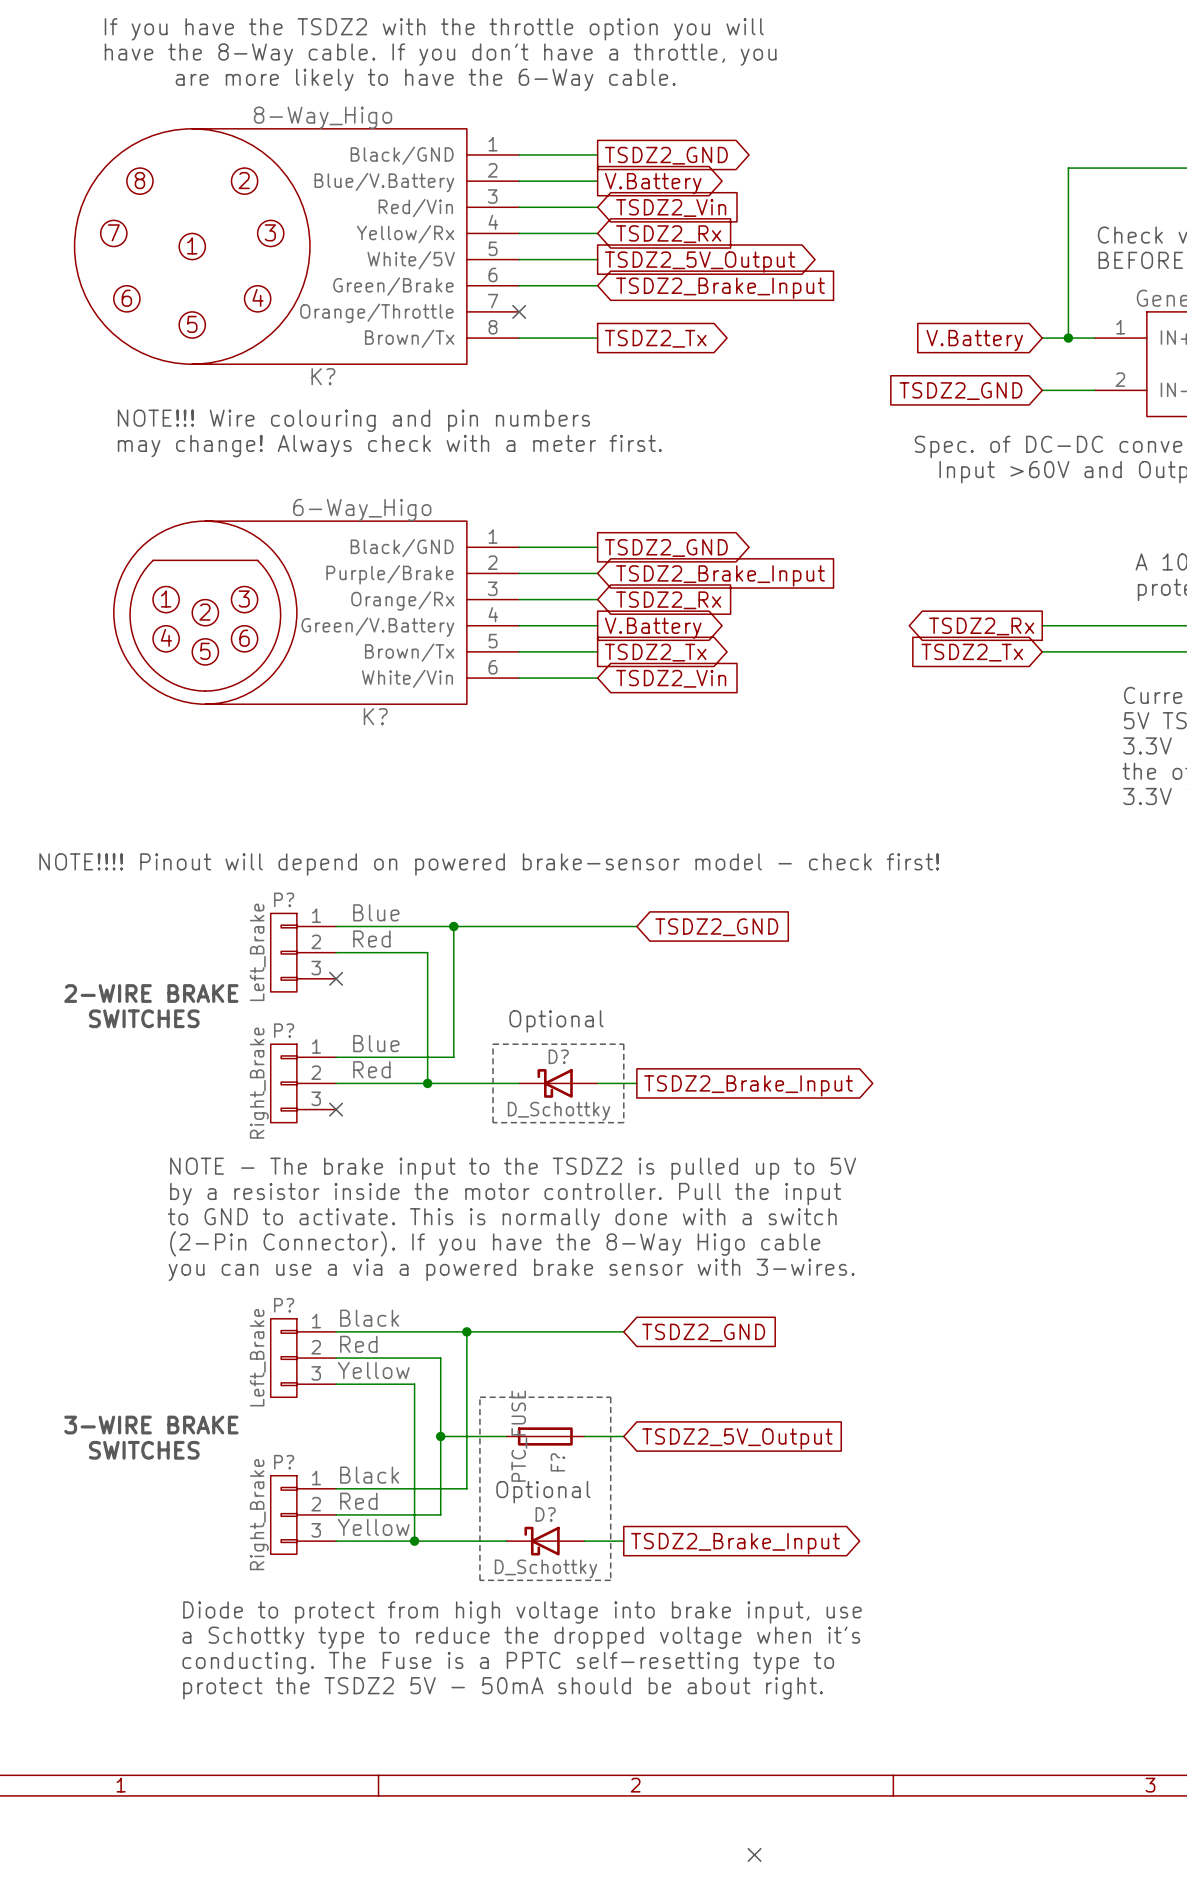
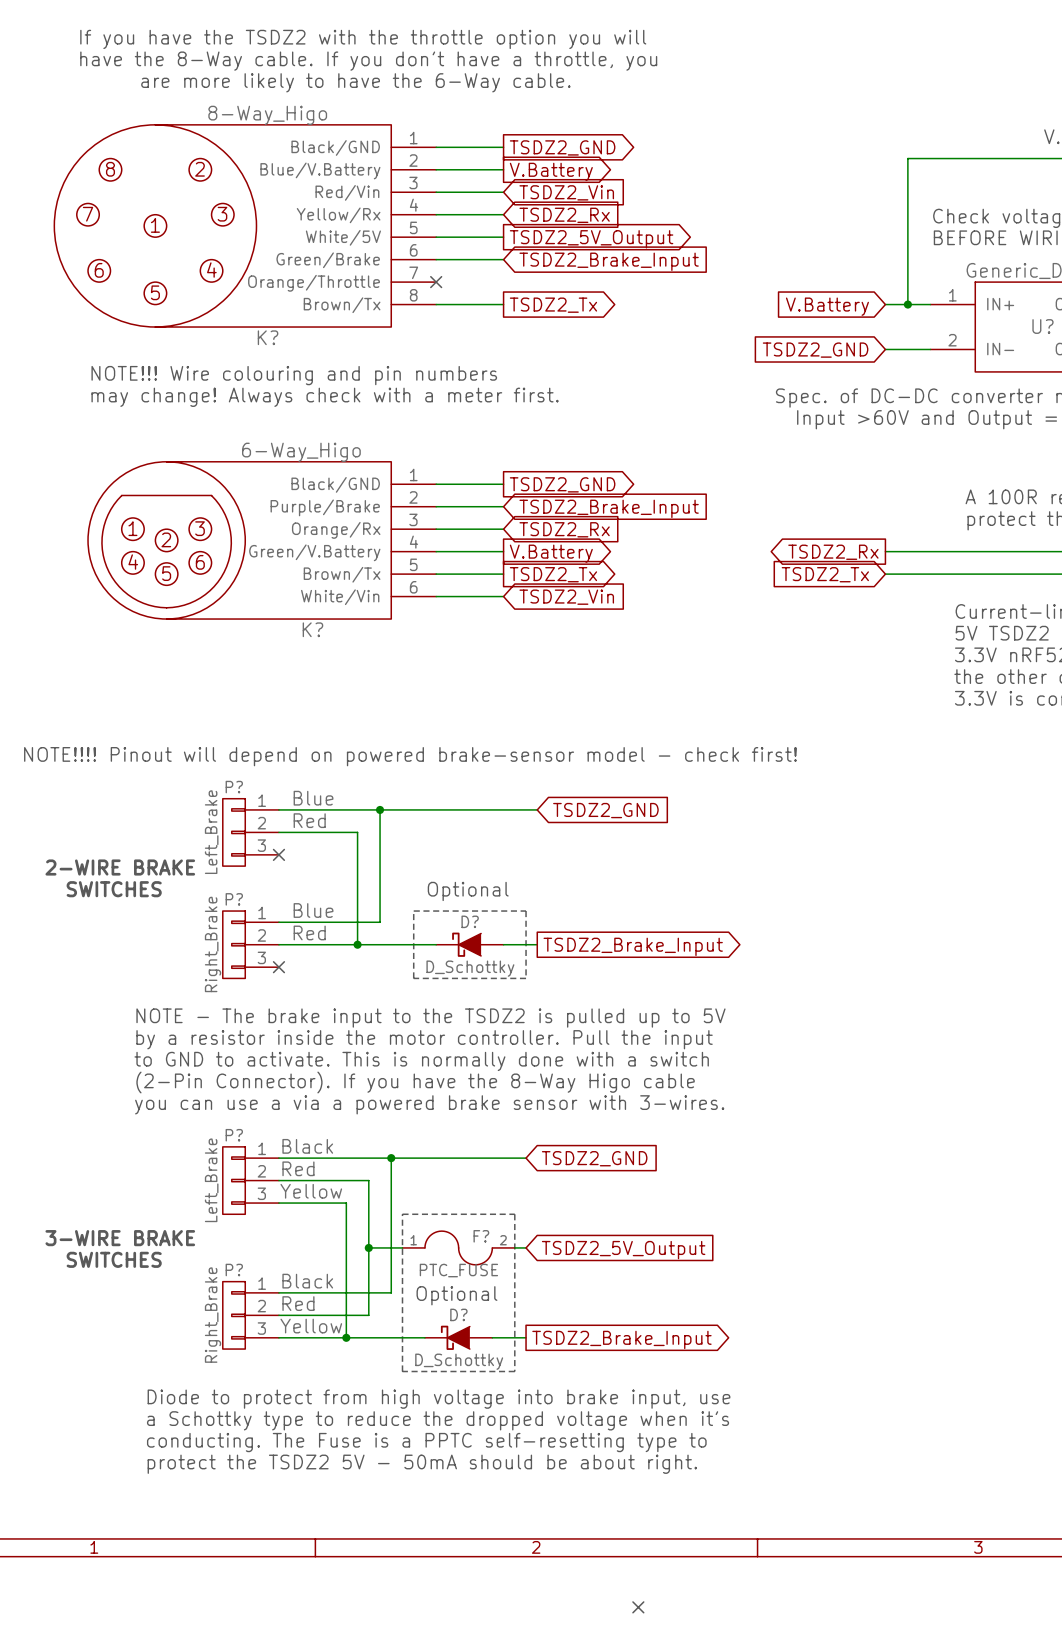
D? symbol: [519, 1069, 598, 1098] -> [436, 932, 504, 957]
F? symbol: [506, 1427, 585, 1446] -> [402, 1231, 515, 1265]
F? value position: PTC_FUSE (519, 1436) -> PTC_FUSE (458, 1270)
F? name position: F? (557, 1462) -> F? (481, 1236)
D? symbol: [506, 1526, 585, 1556] -> [424, 1325, 493, 1350]

